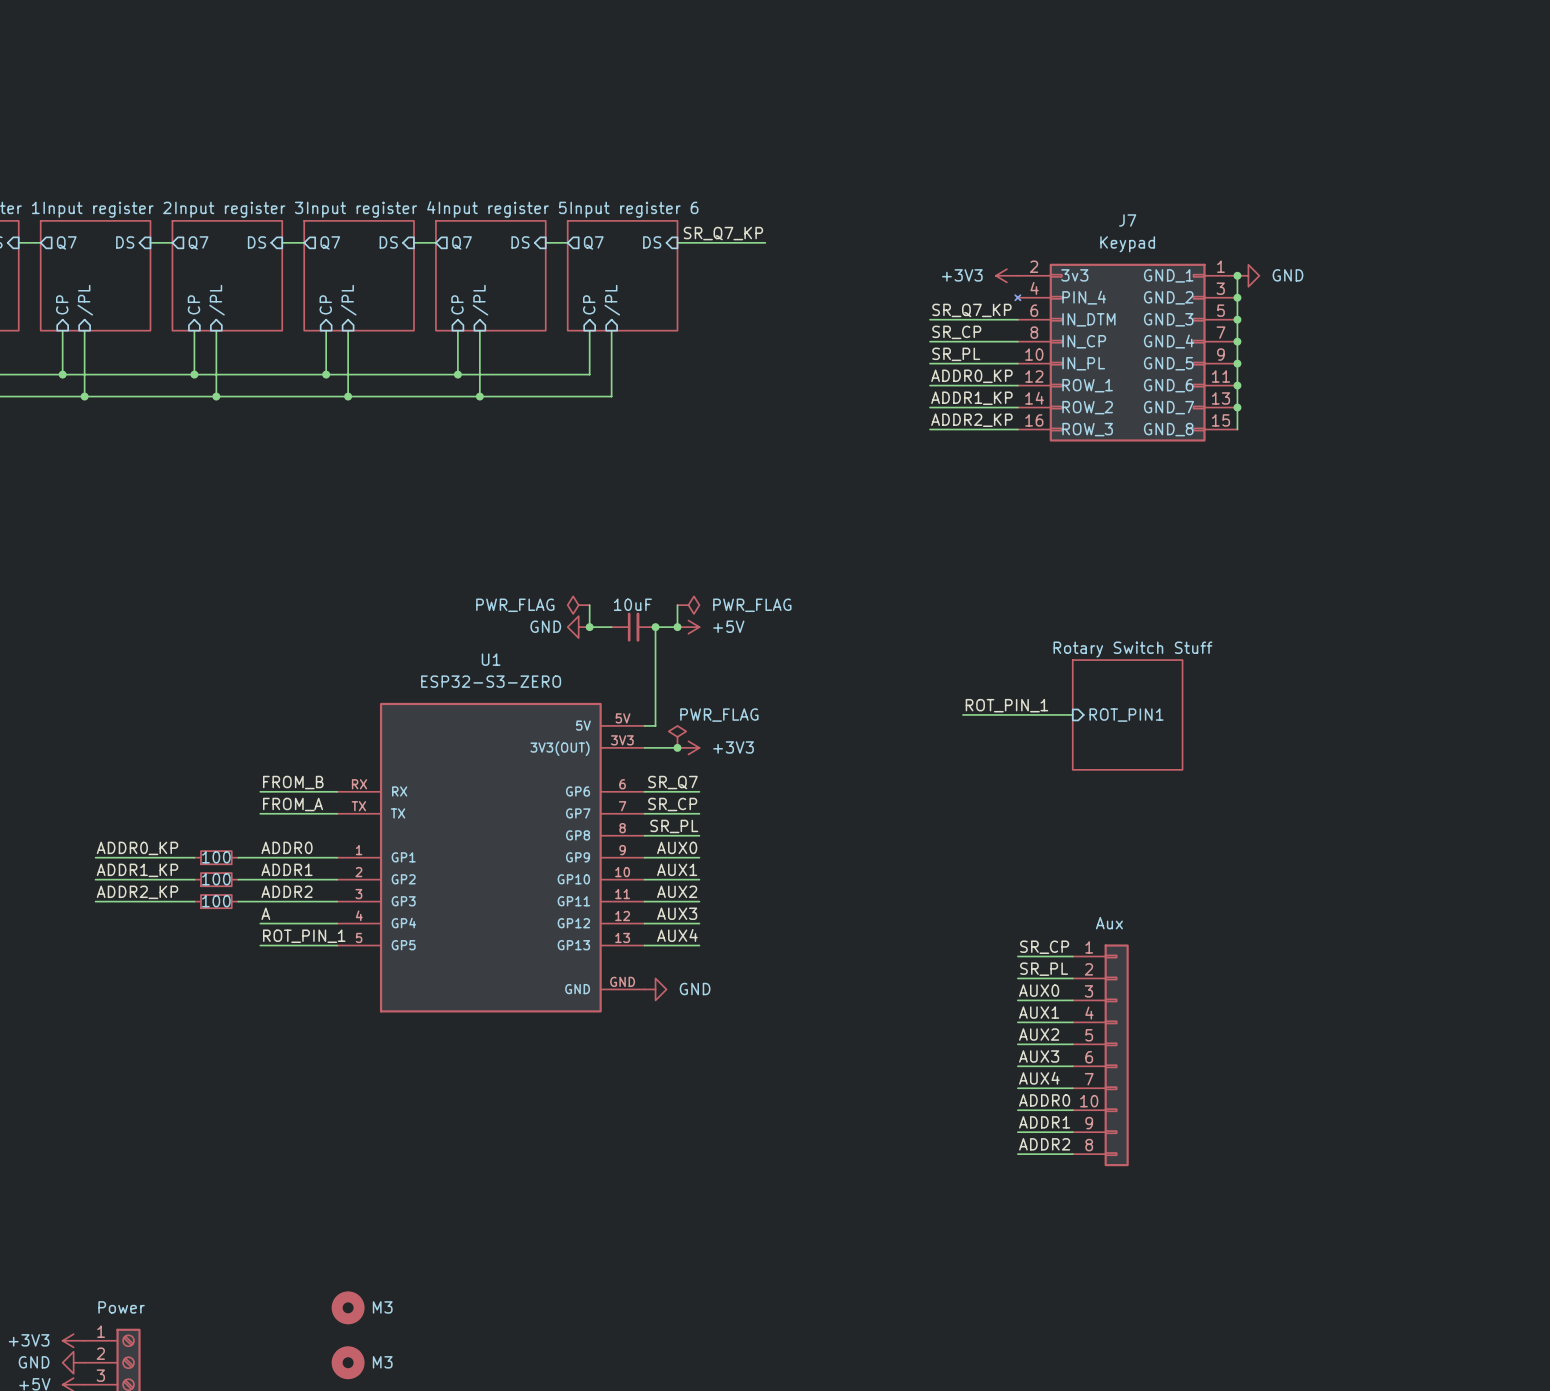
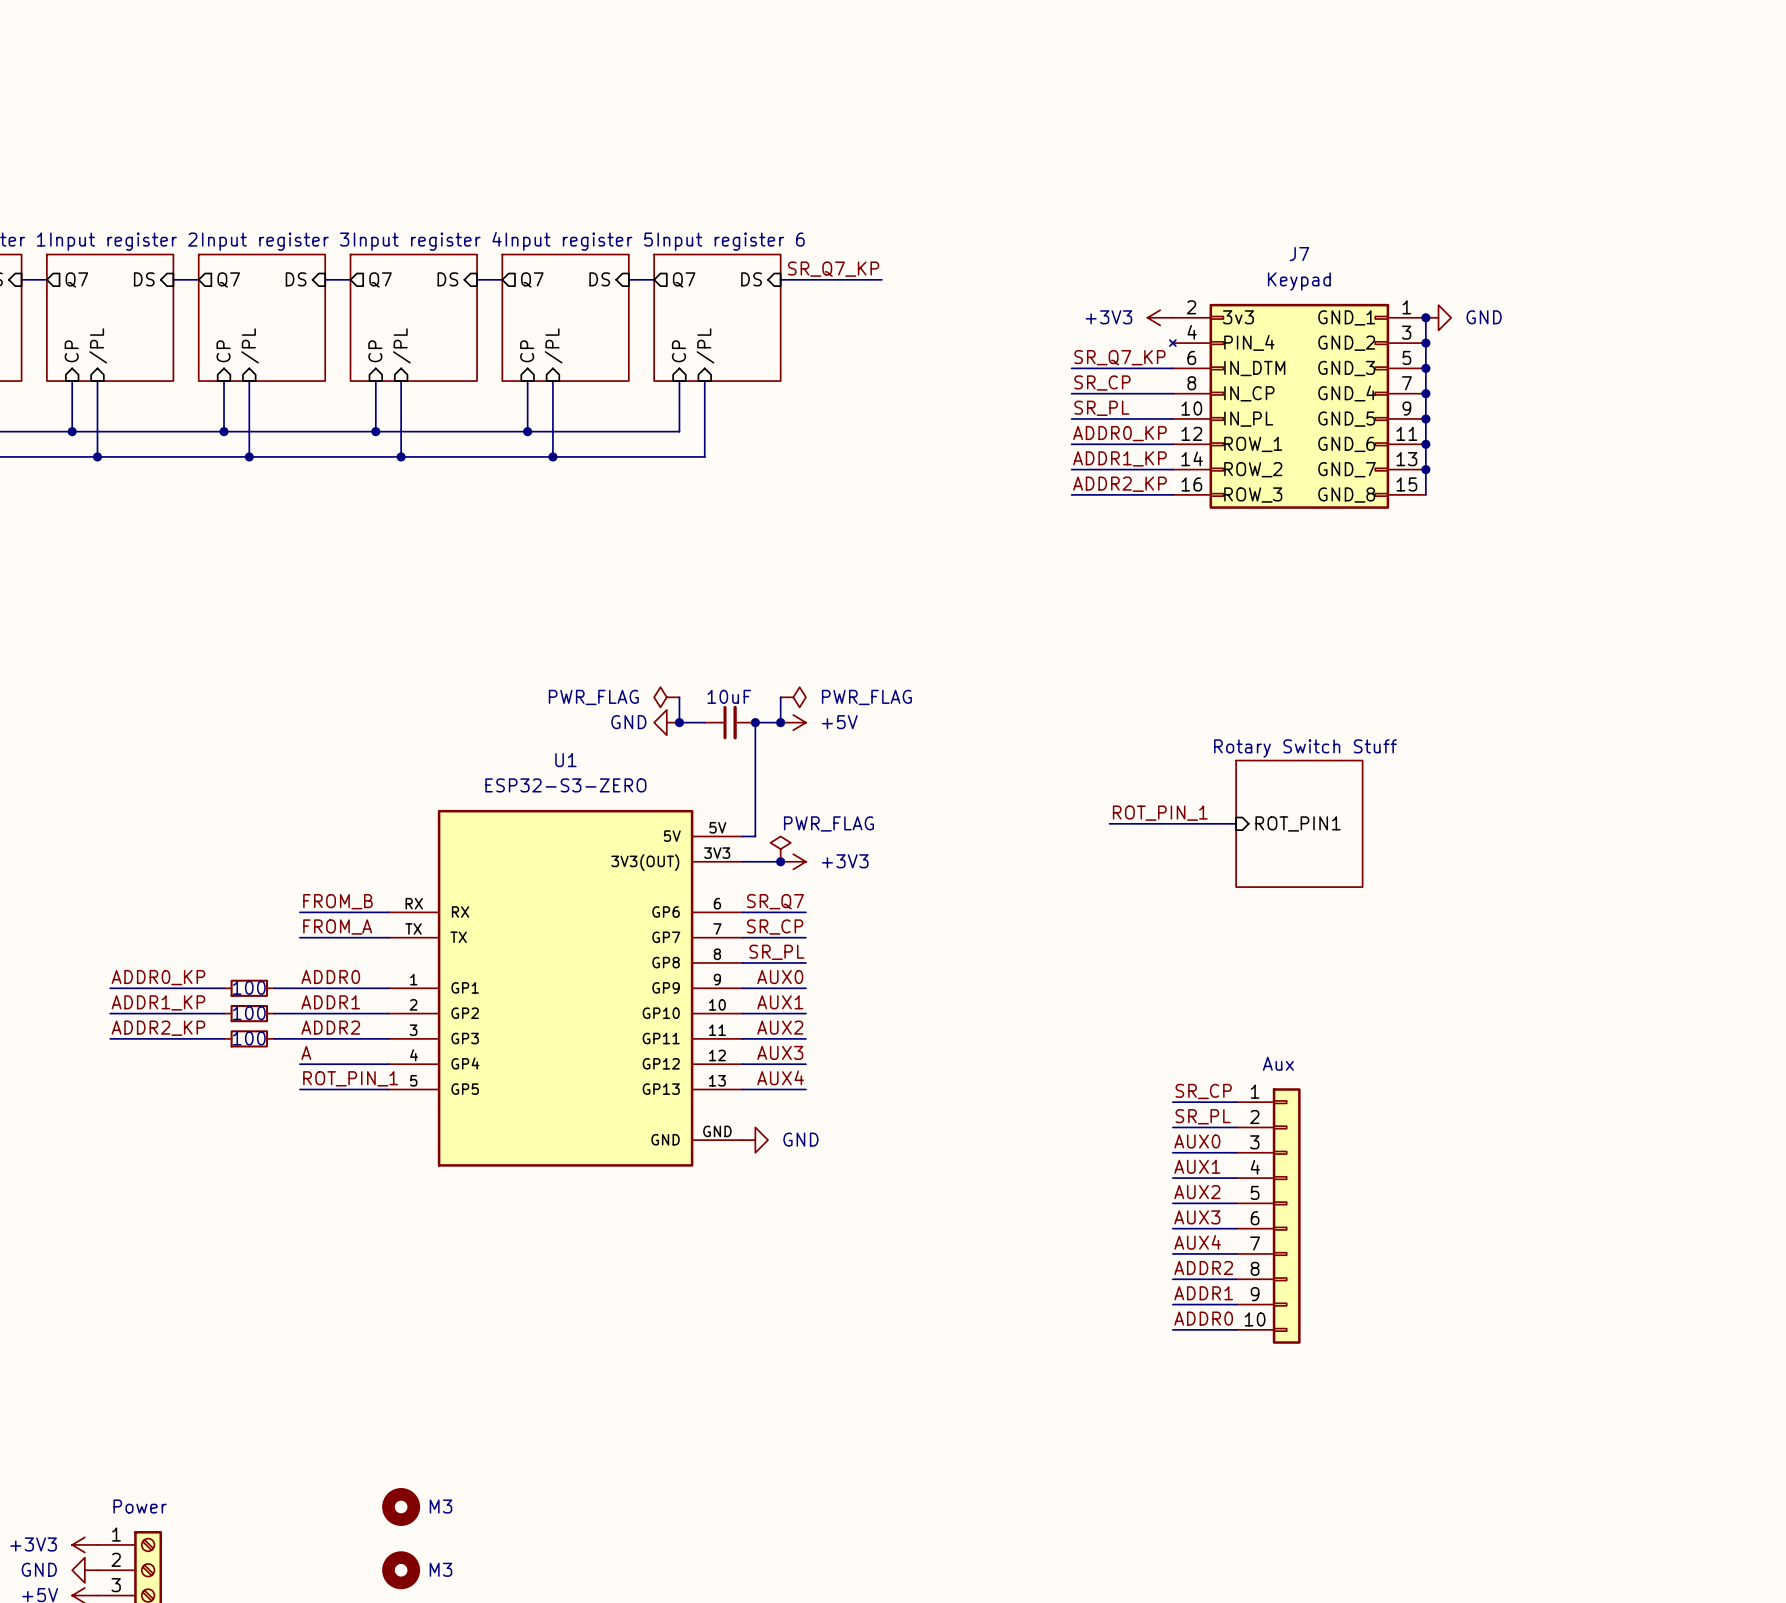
label: ADDR0 (1044, 1100) -> ADDR2 (1203, 1267)
part pin number: 10 (1089, 1101) -> 8 (1255, 1268)
label: ADDR2 (1044, 1144) -> ADDR0 (1203, 1318)
part pin number: 8 (1089, 1145) -> 10 (1255, 1319)

